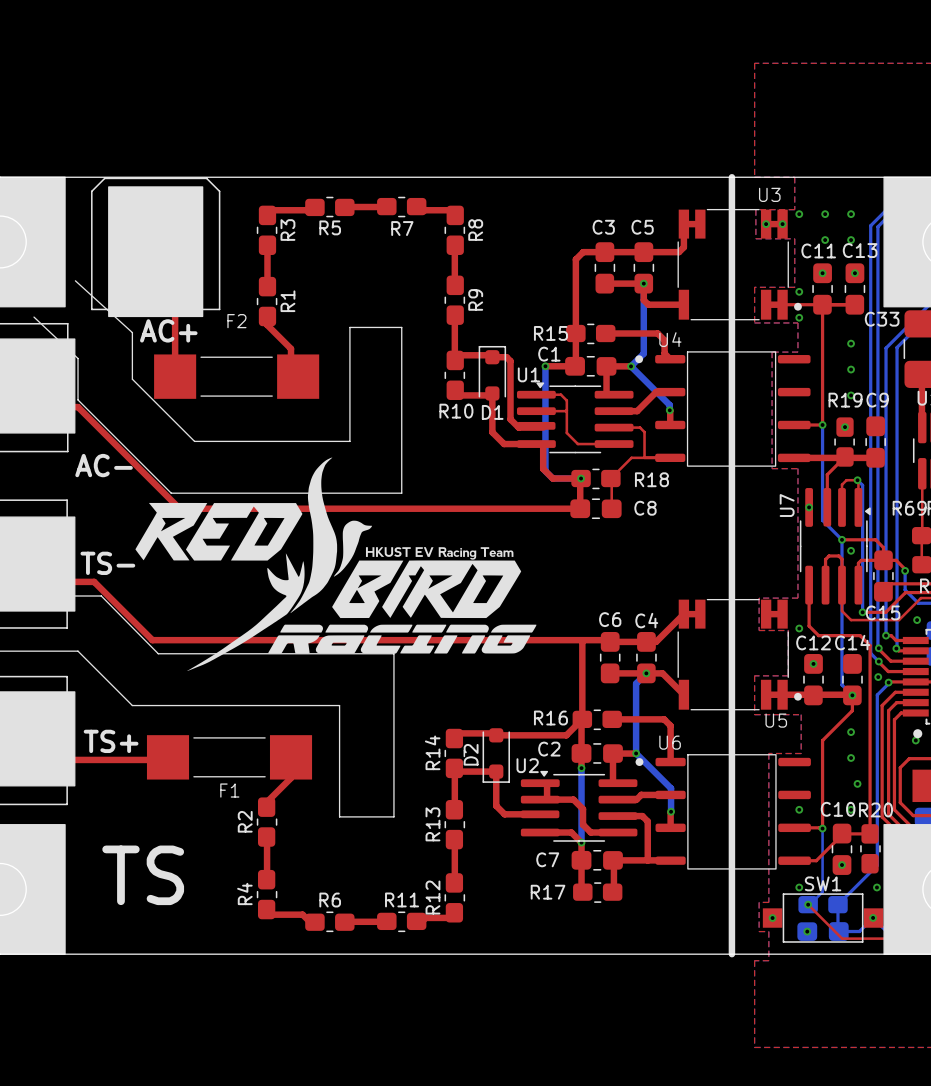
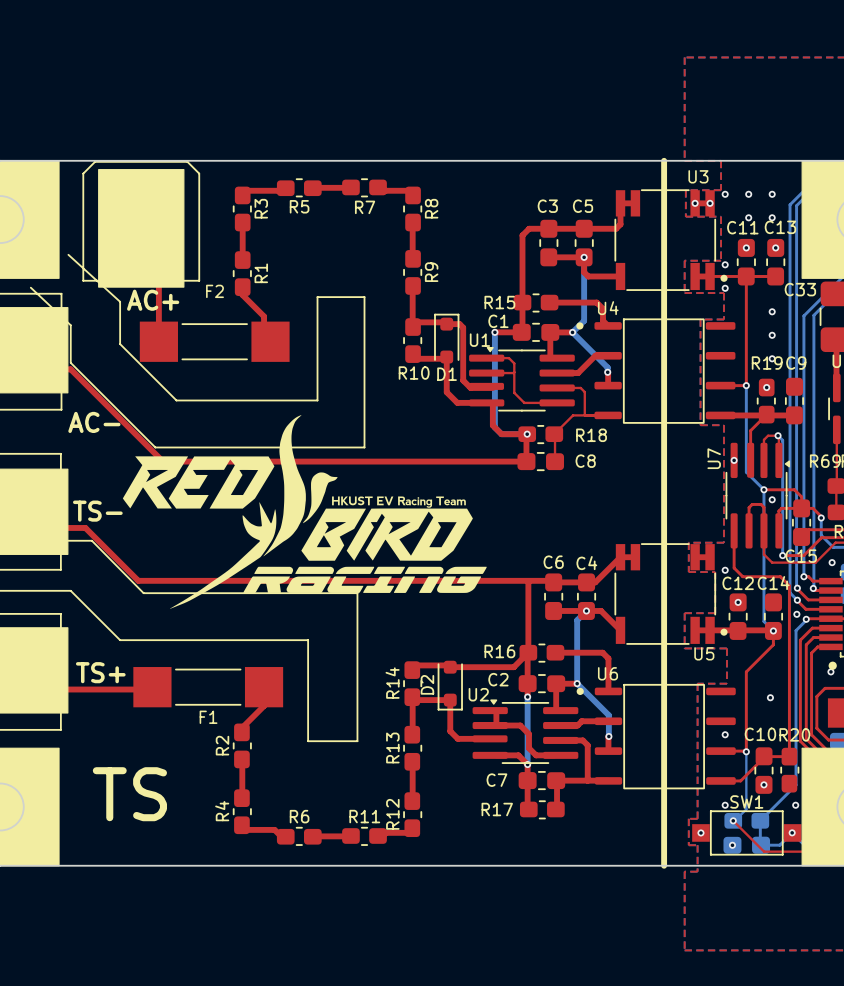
via: (851, 732) -> none
via: (851, 758) -> none
via: none -> (770, 697)
via: (857, 783) -> none
via: (851, 809) -> none

